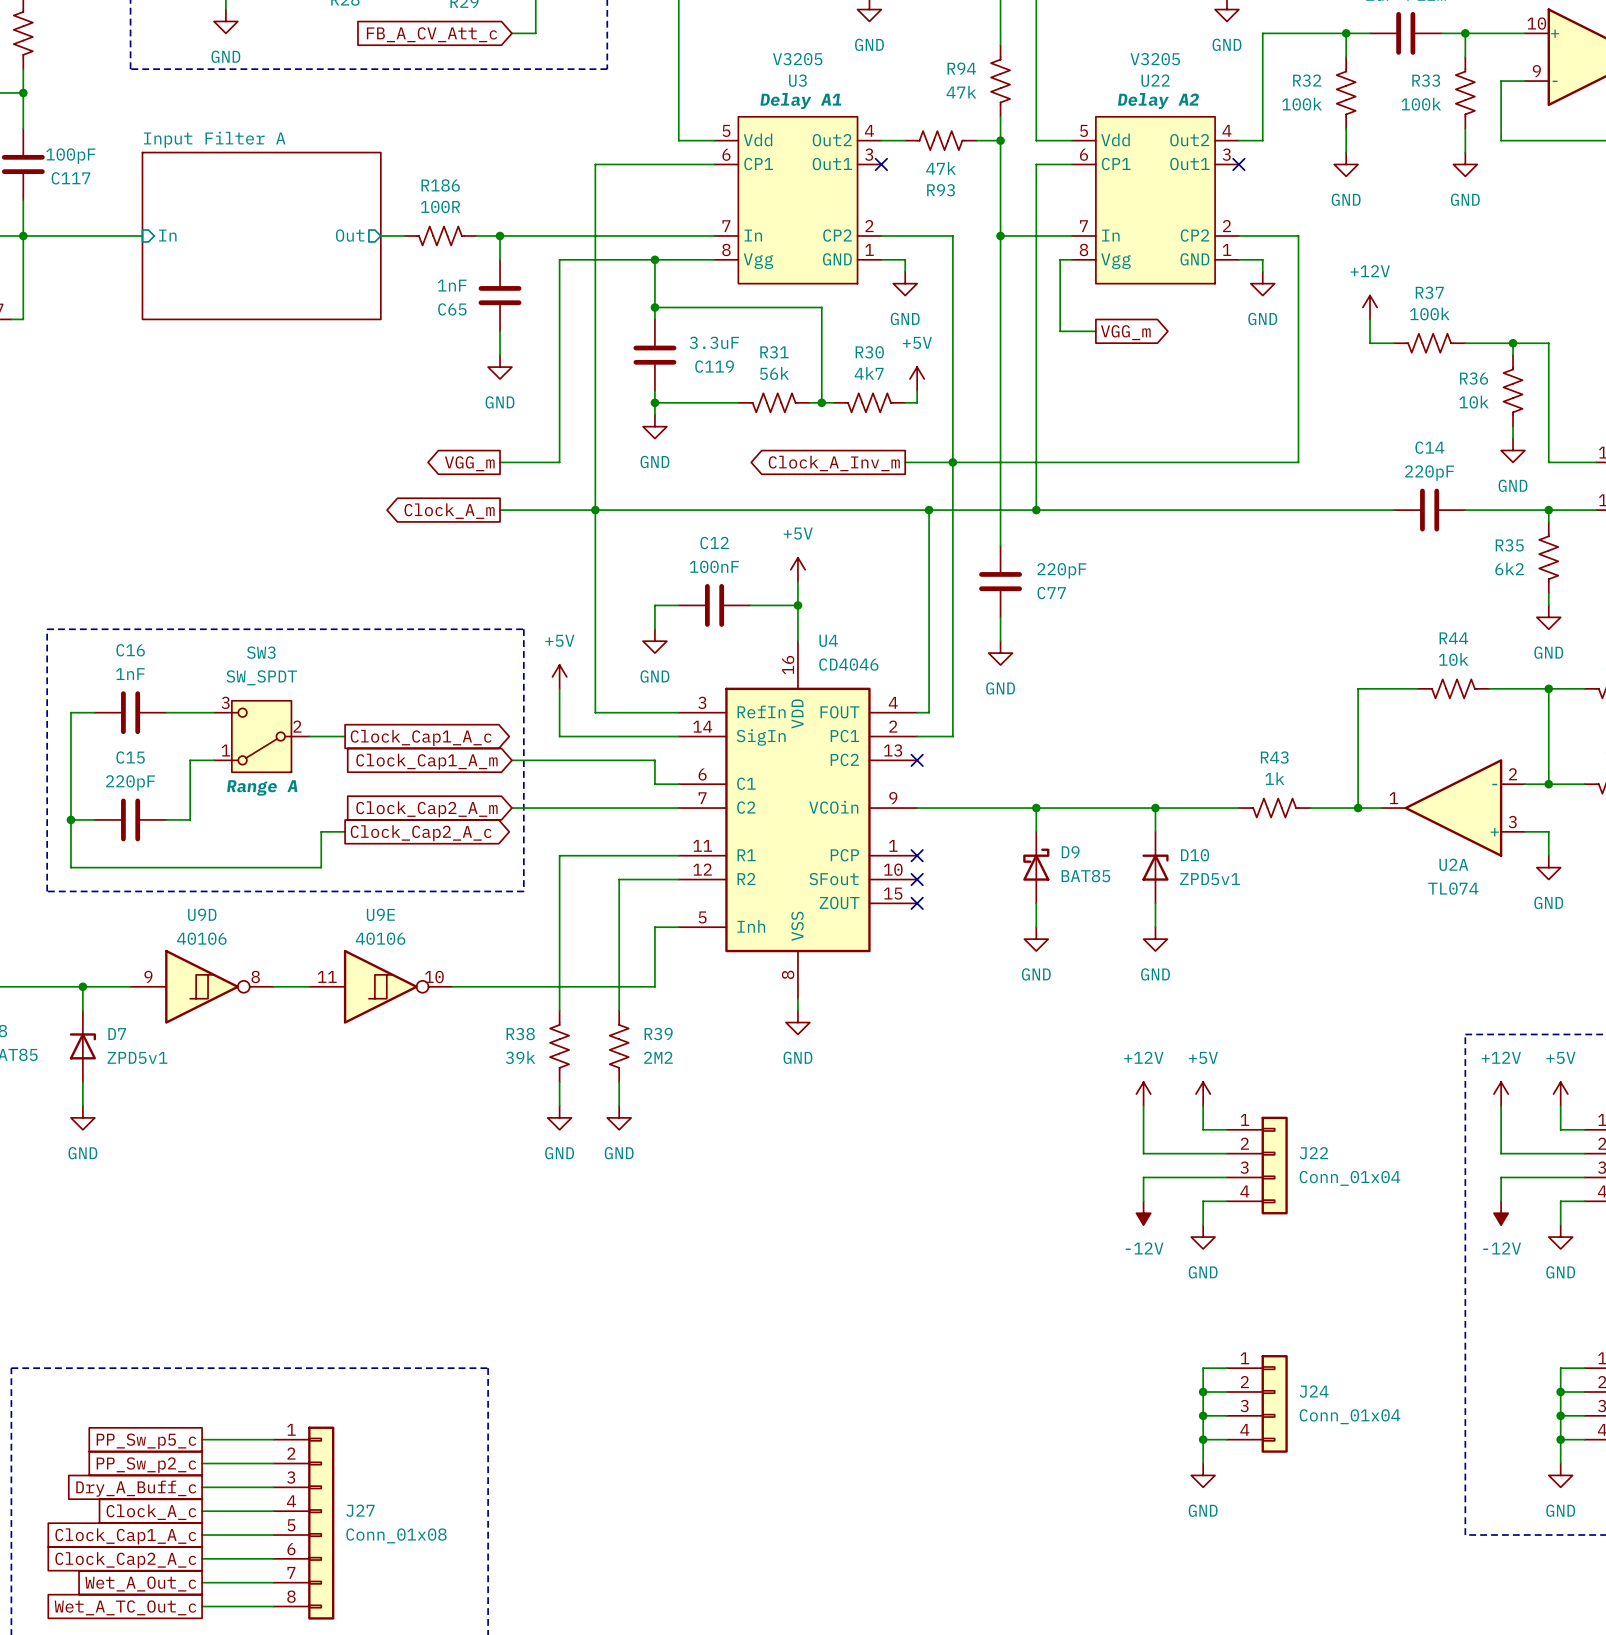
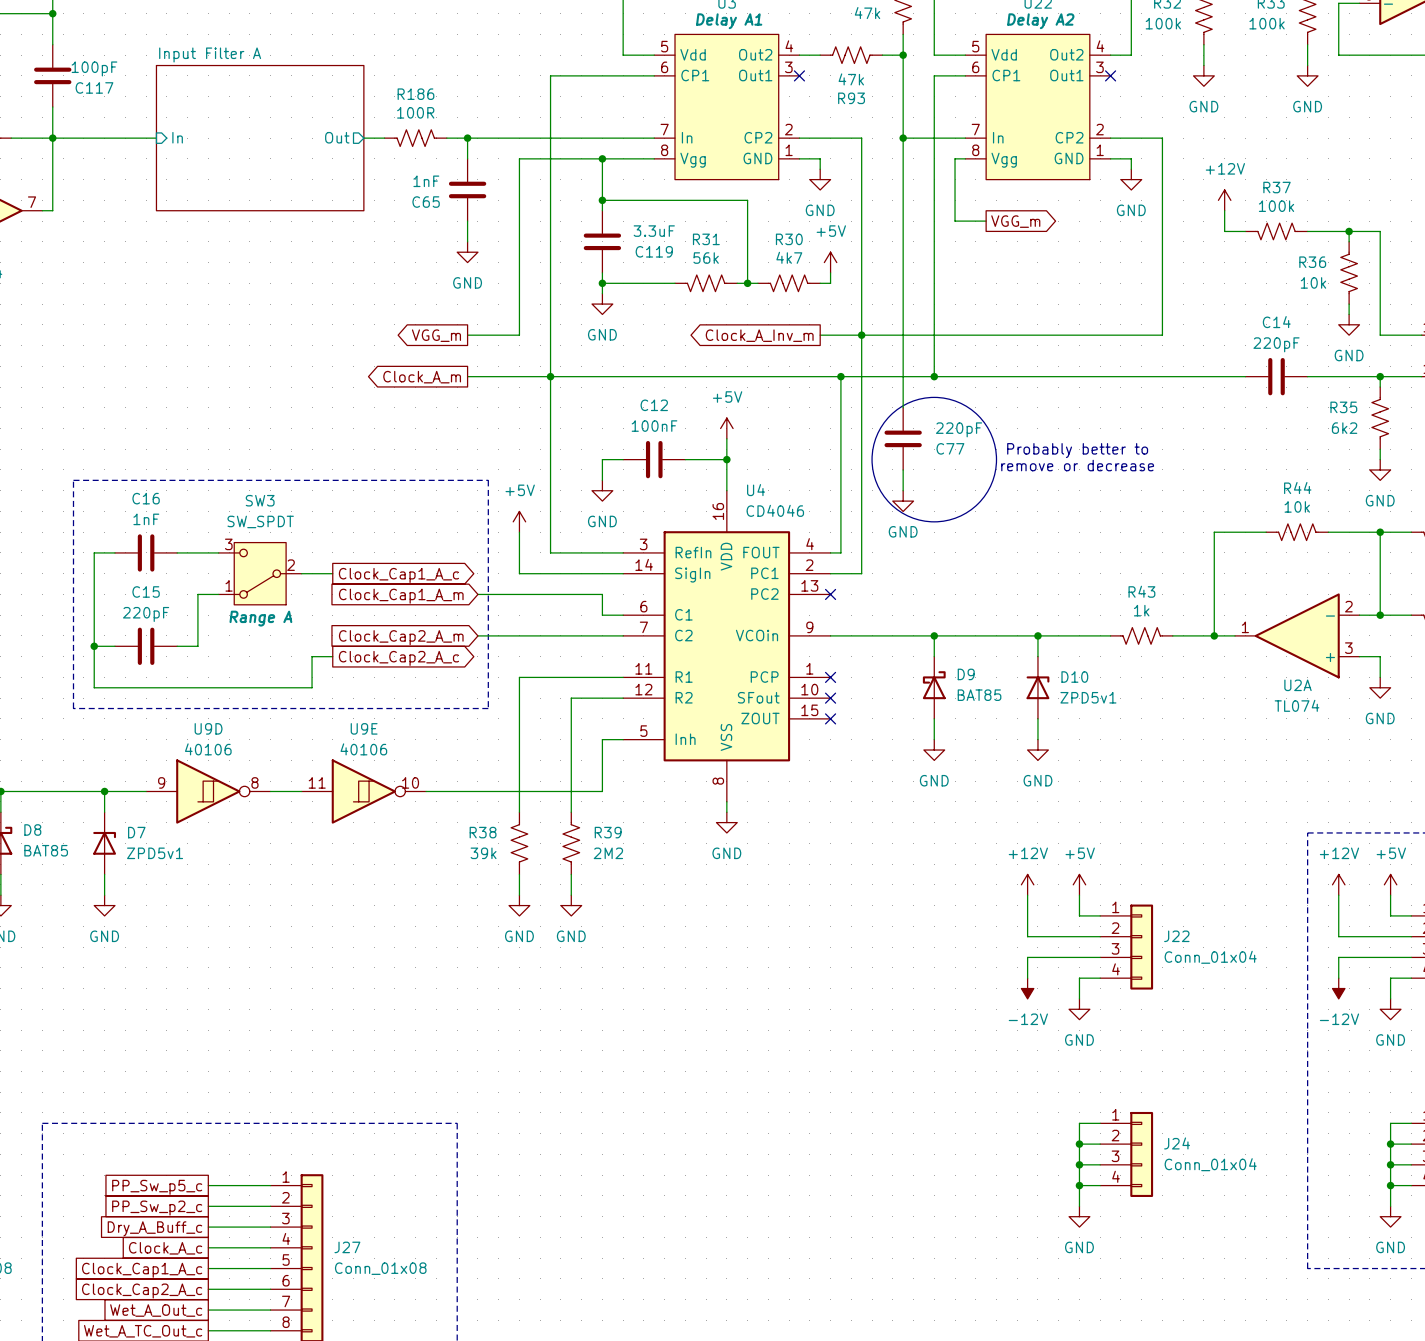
drawing: none -> [872, 397, 997, 522]
text: none -> Probably better to (1077, 450)
text: none -> remove or decrease (1077, 465)

